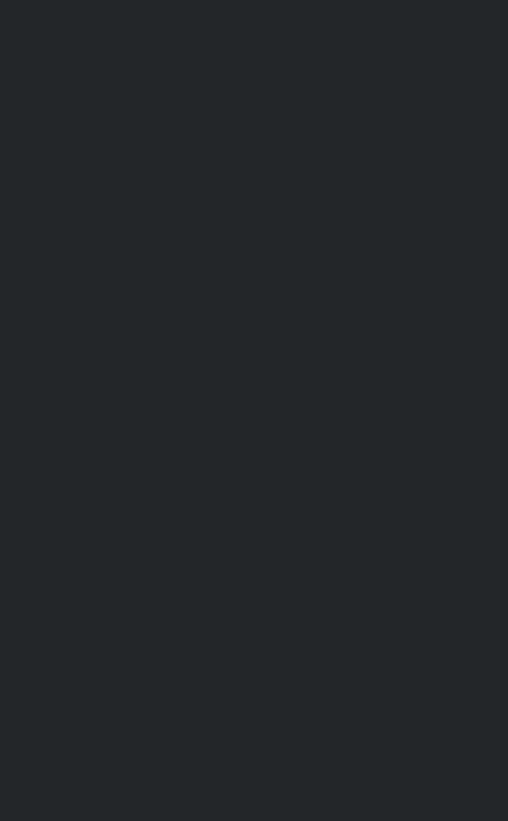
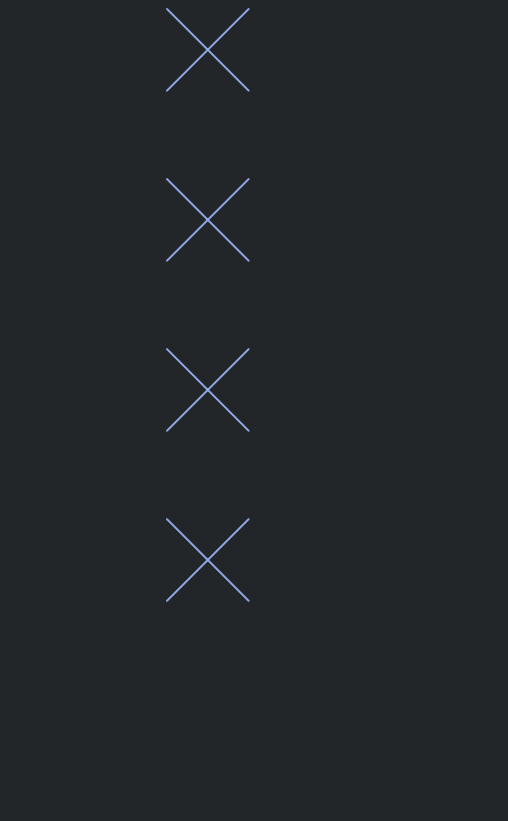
no-connect mark: none -> (207, 49)
no-connect mark: none -> (207, 219)
no-connect mark: none -> (207, 389)
no-connect mark: none -> (207, 559)

